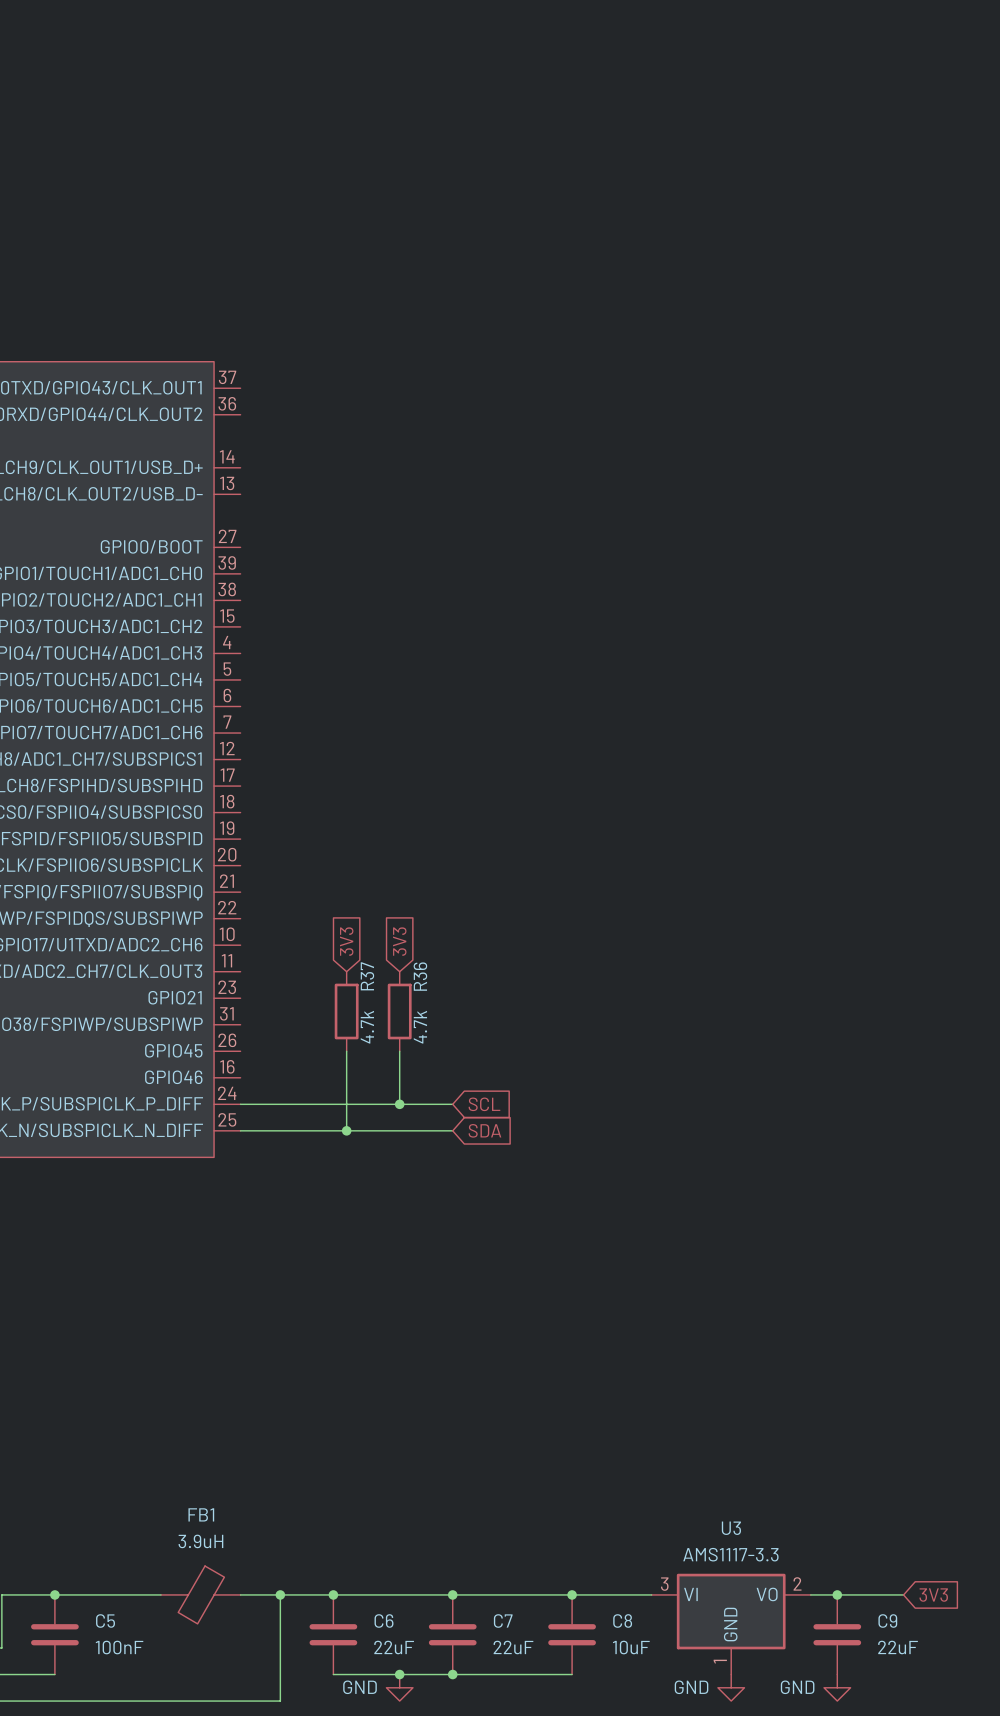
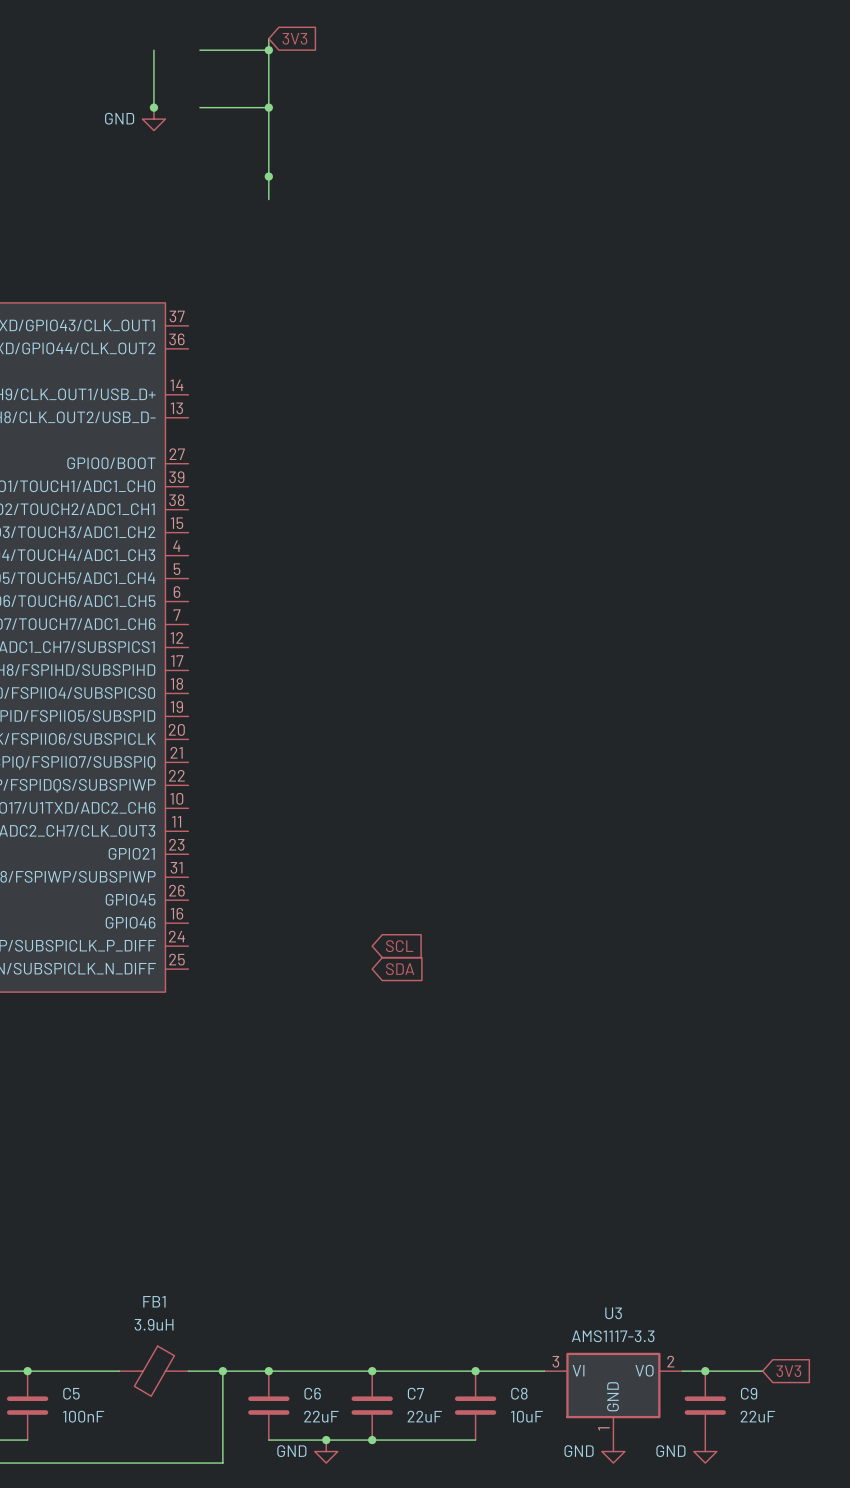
wire: none -> (268, 38) (268, 199)
global label: none -> 3V3 (294, 38)
wire: none -> (153, 50) (153, 107)
wire: none -> (199, 50) (268, 50)
junction: none -> (268, 50)
junction: none -> (153, 107)
wire: none -> (199, 107) (268, 107)
junction: none -> (268, 107)
power symbol: none -> GND (153, 119)
junction: none -> (268, 176)
global label: 3V3 (346, 941) -> none
global label: 3V3 (399, 941) -> none
R37: 4.7k (346, 1011) -> none
R36: 4.7k (399, 1011) -> none
wire: (346, 1051) (346, 1130) -> none
wire: (399, 1051) (399, 1104) -> none
wire: (240, 1104) (452, 1104) -> none
junction: (399, 1104) -> none
wire: (240, 1130) (452, 1130) -> none
junction: (346, 1130) -> none

